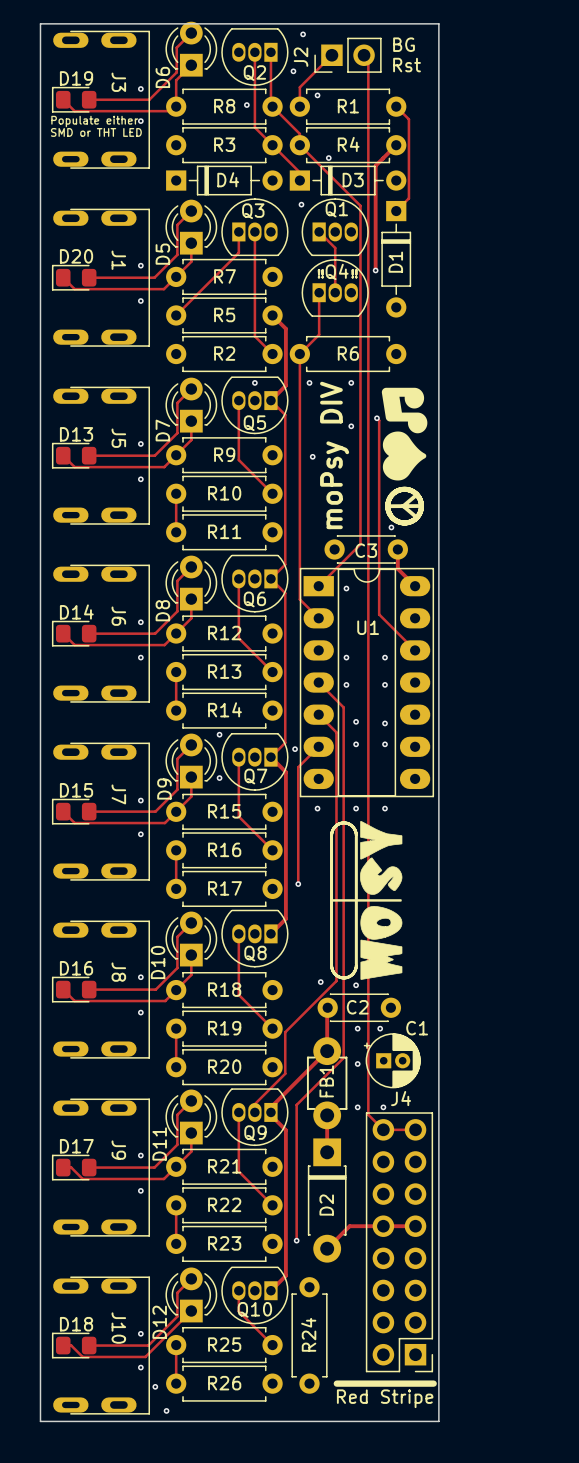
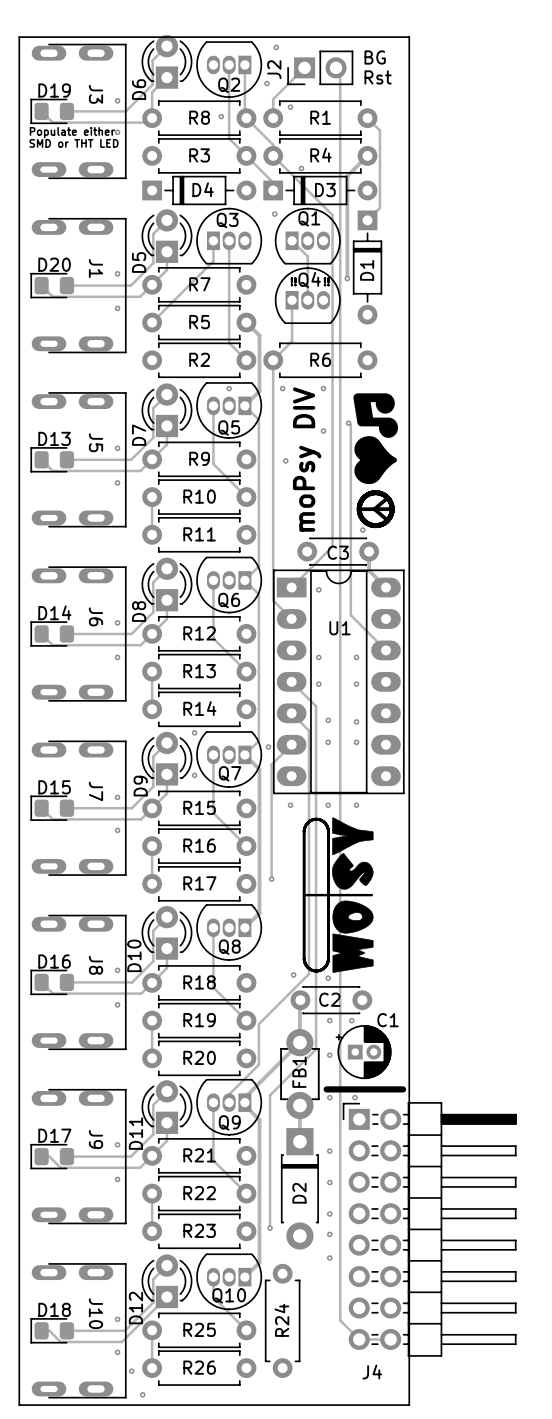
line: none -> (326, 1089) (403, 1089)
J4 name position: J4 (401, 1098) -> J4 (372, 1372)
J4 footprint: [365, 1112, 434, 1373] -> [342, 1102, 517, 1357]
track: (368, 1114) (383, 1129) (415, 1129) -> (340, 1104) (340, 1320) (359, 1339) (390, 1339)
via: none -> (329, 1151)
via: none -> (329, 1182)
via: none -> (329, 1214)
track: (415, 1226) (349, 1226) (327, 1248) -> none
via: none -> (329, 1234)
via: none -> (329, 1258)
line: (336, 1383) (433, 1383) -> none
text: Red Stripe (385, 1398) -> none

